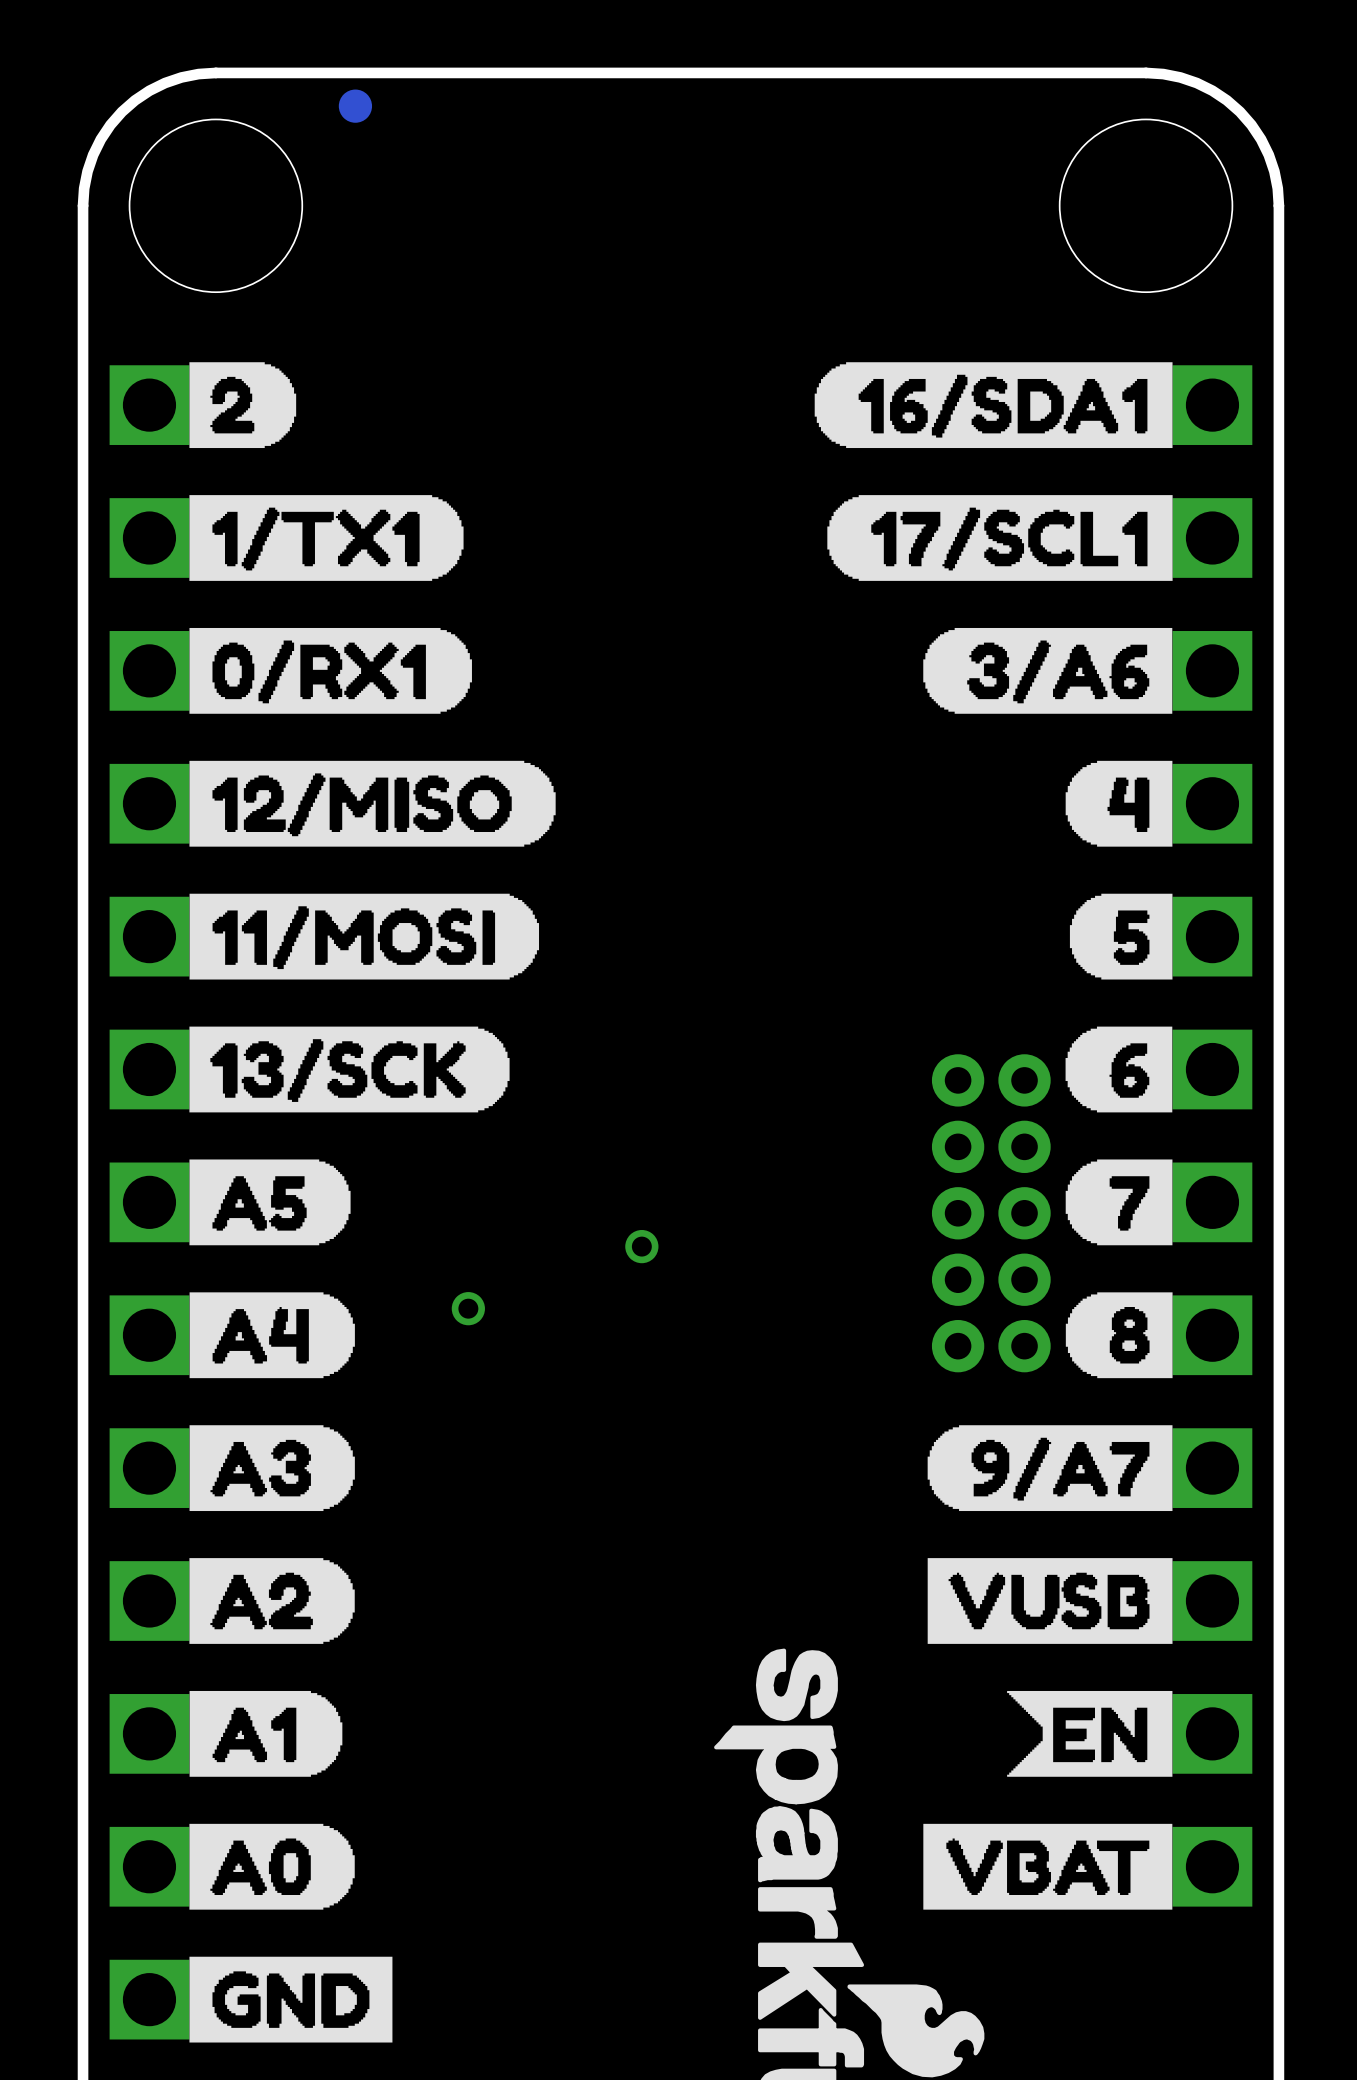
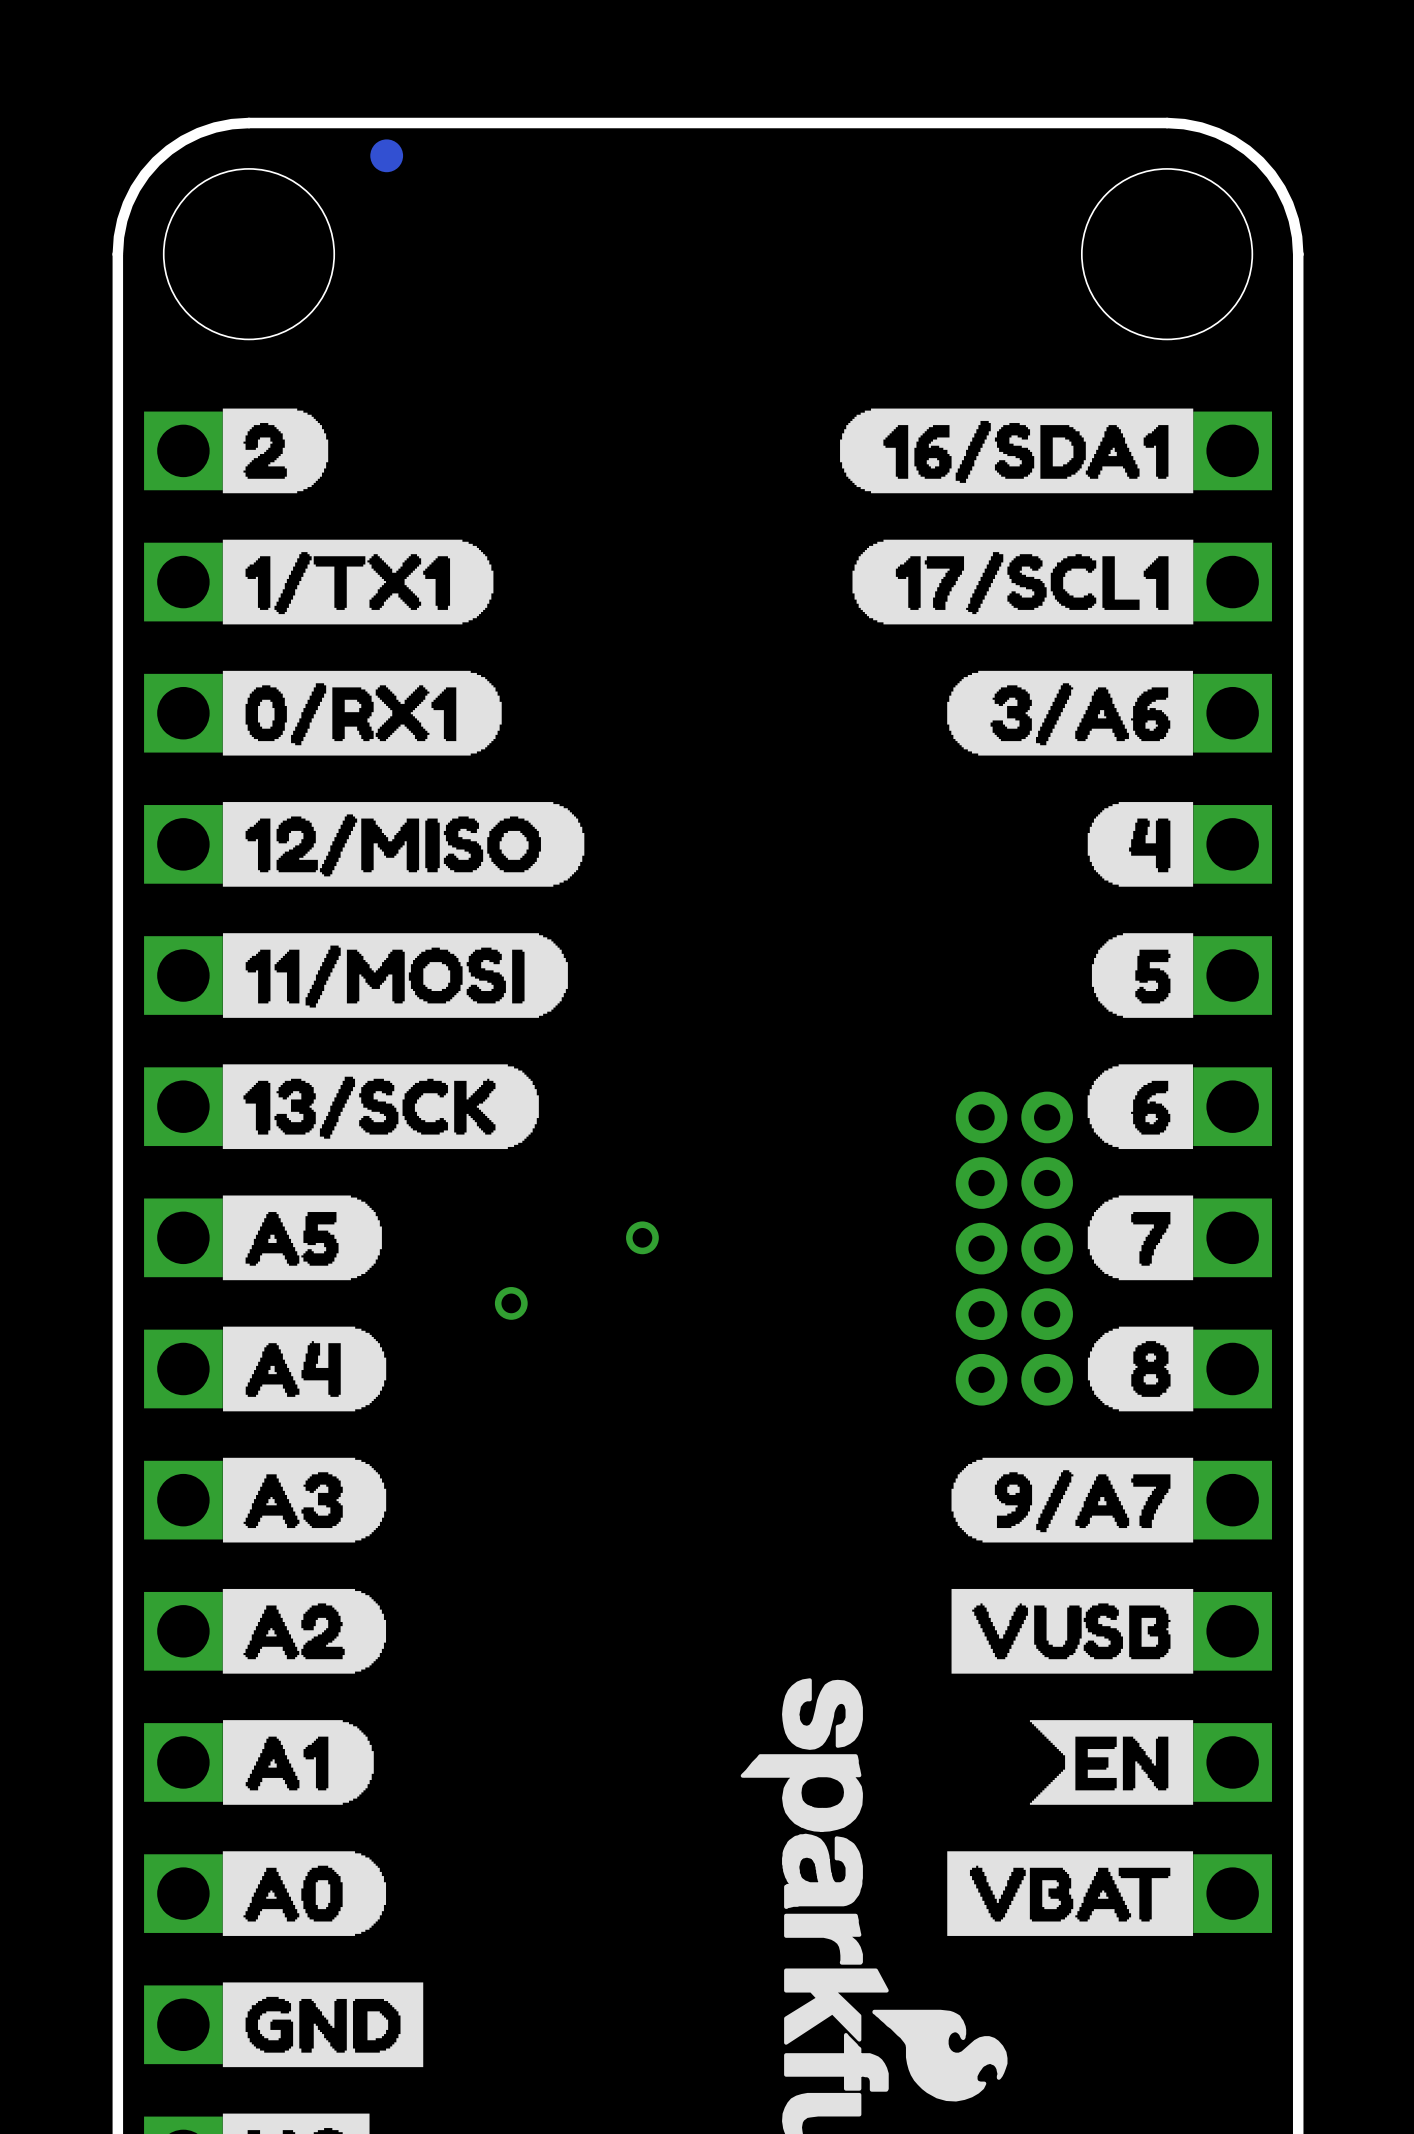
part position: (641, 1246) -> (642, 1237)
part position: (468, 1308) -> (511, 1303)

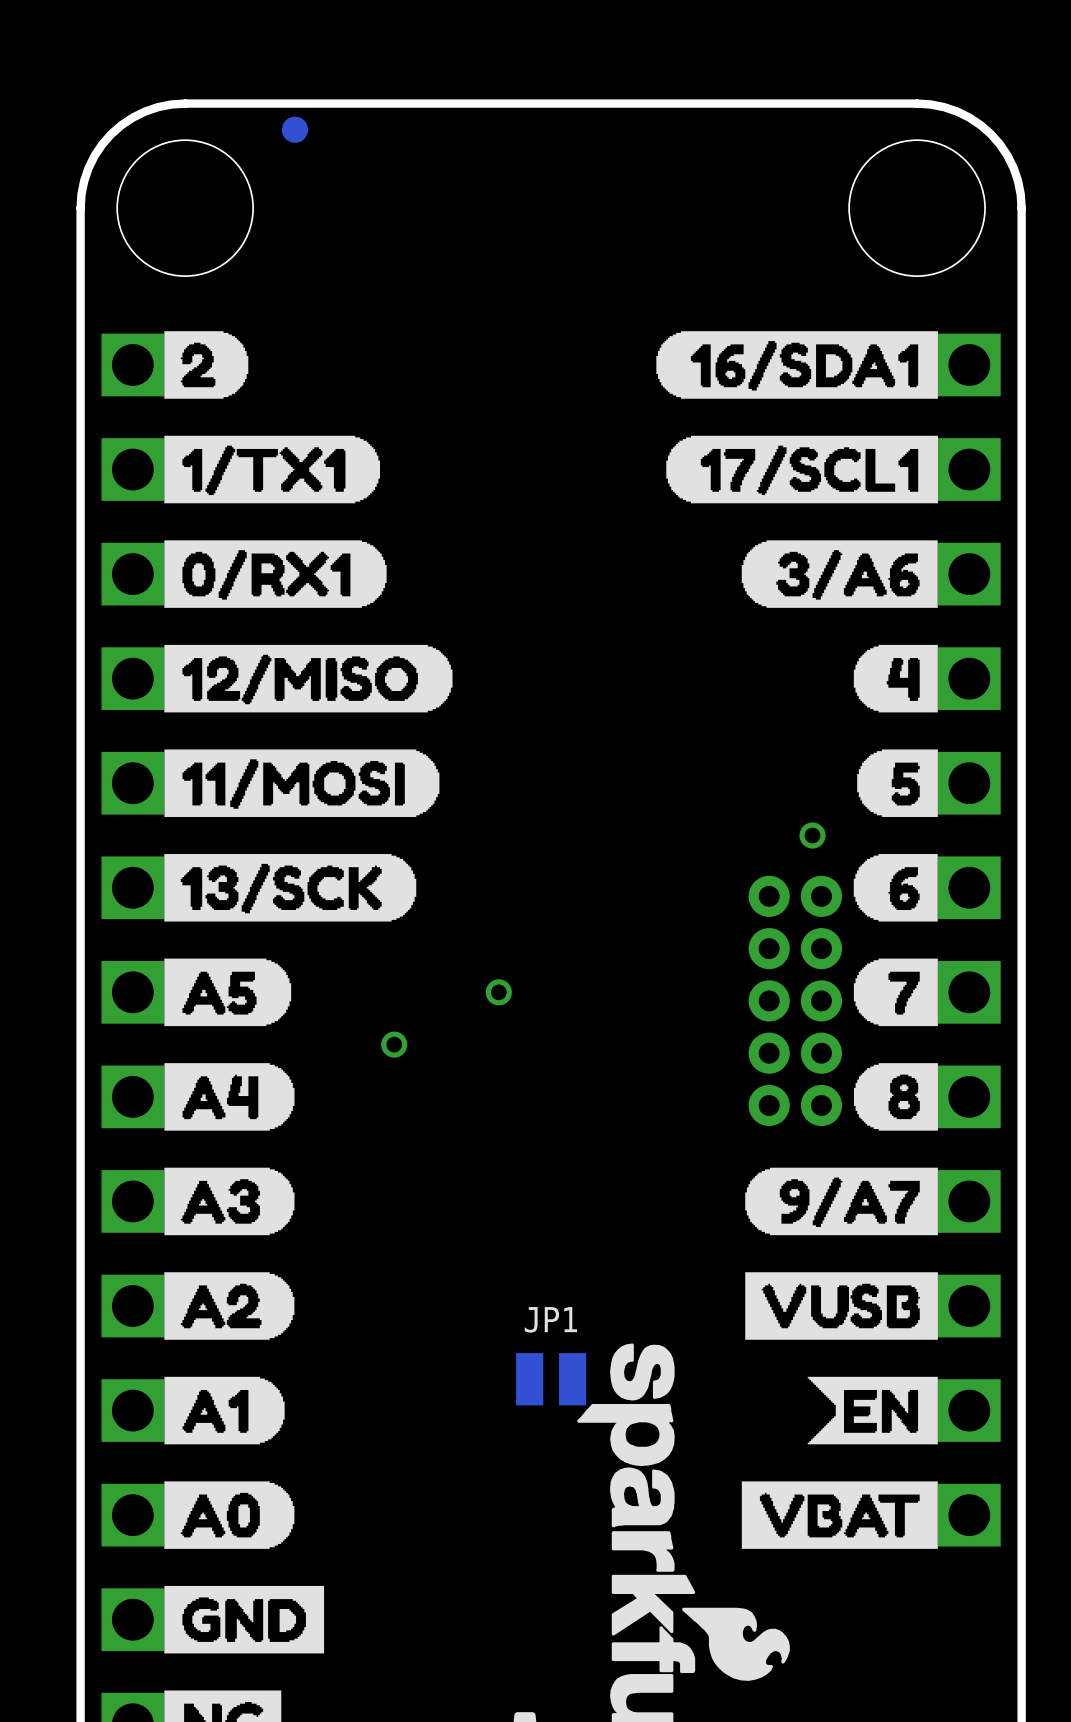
part: none -> (812, 835)
JP1: none -> (551, 1379)

